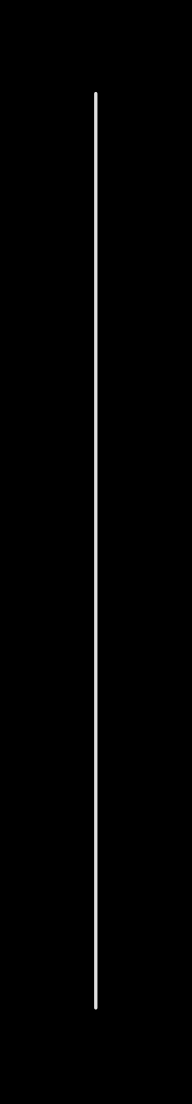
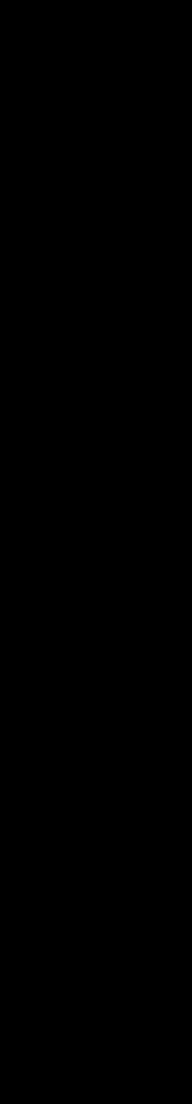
line: (95, 93) (95, 1007) -> none

